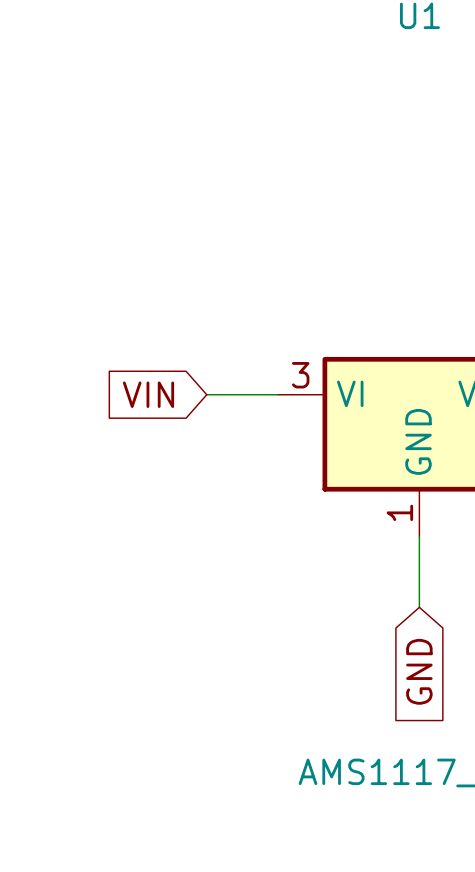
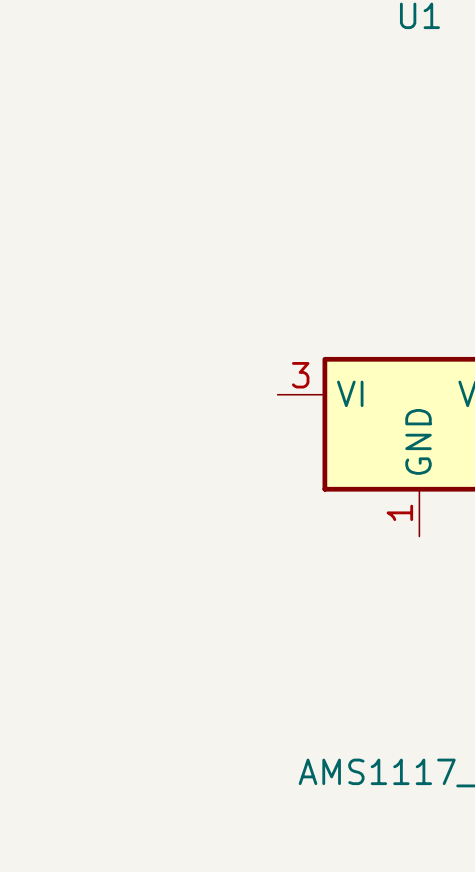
global label: VIN (148, 394) -> none
wire: (206, 394) (277, 394) -> none
wire: (419, 536) (419, 607) -> none
global label: GND (419, 671) -> none

